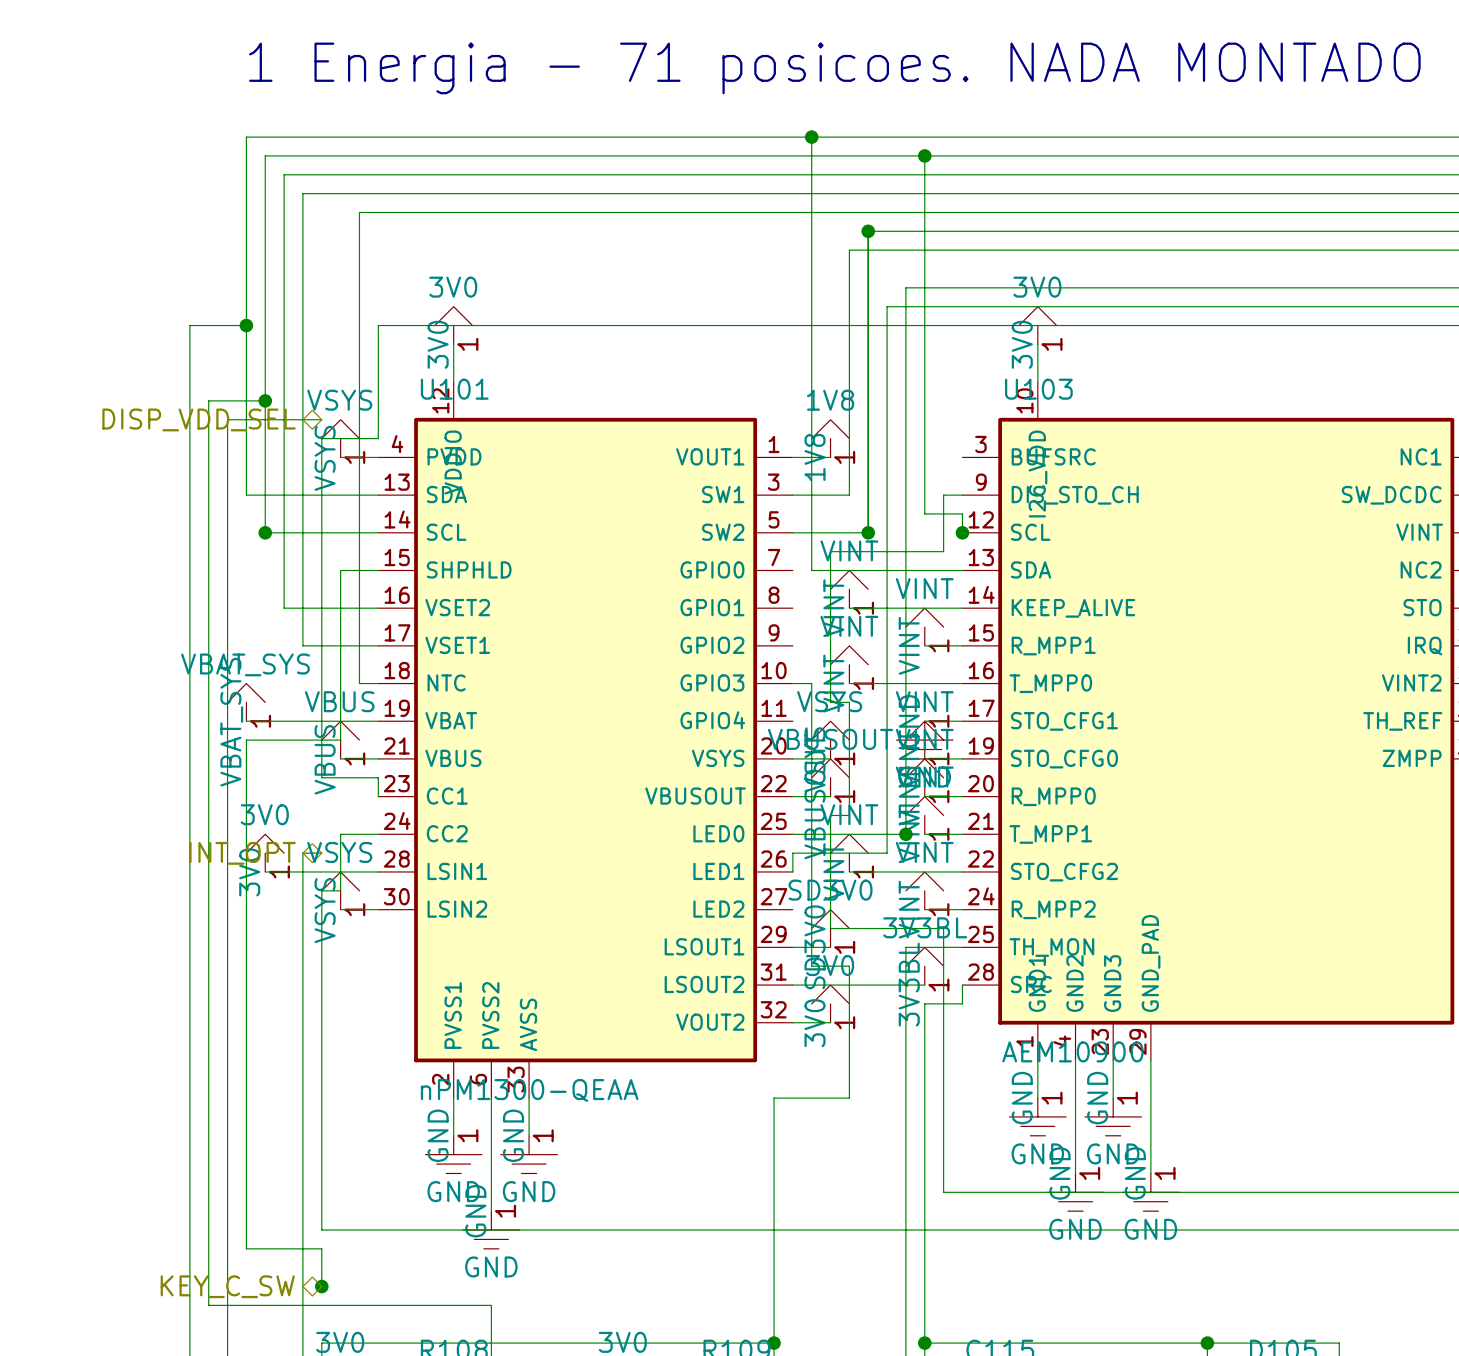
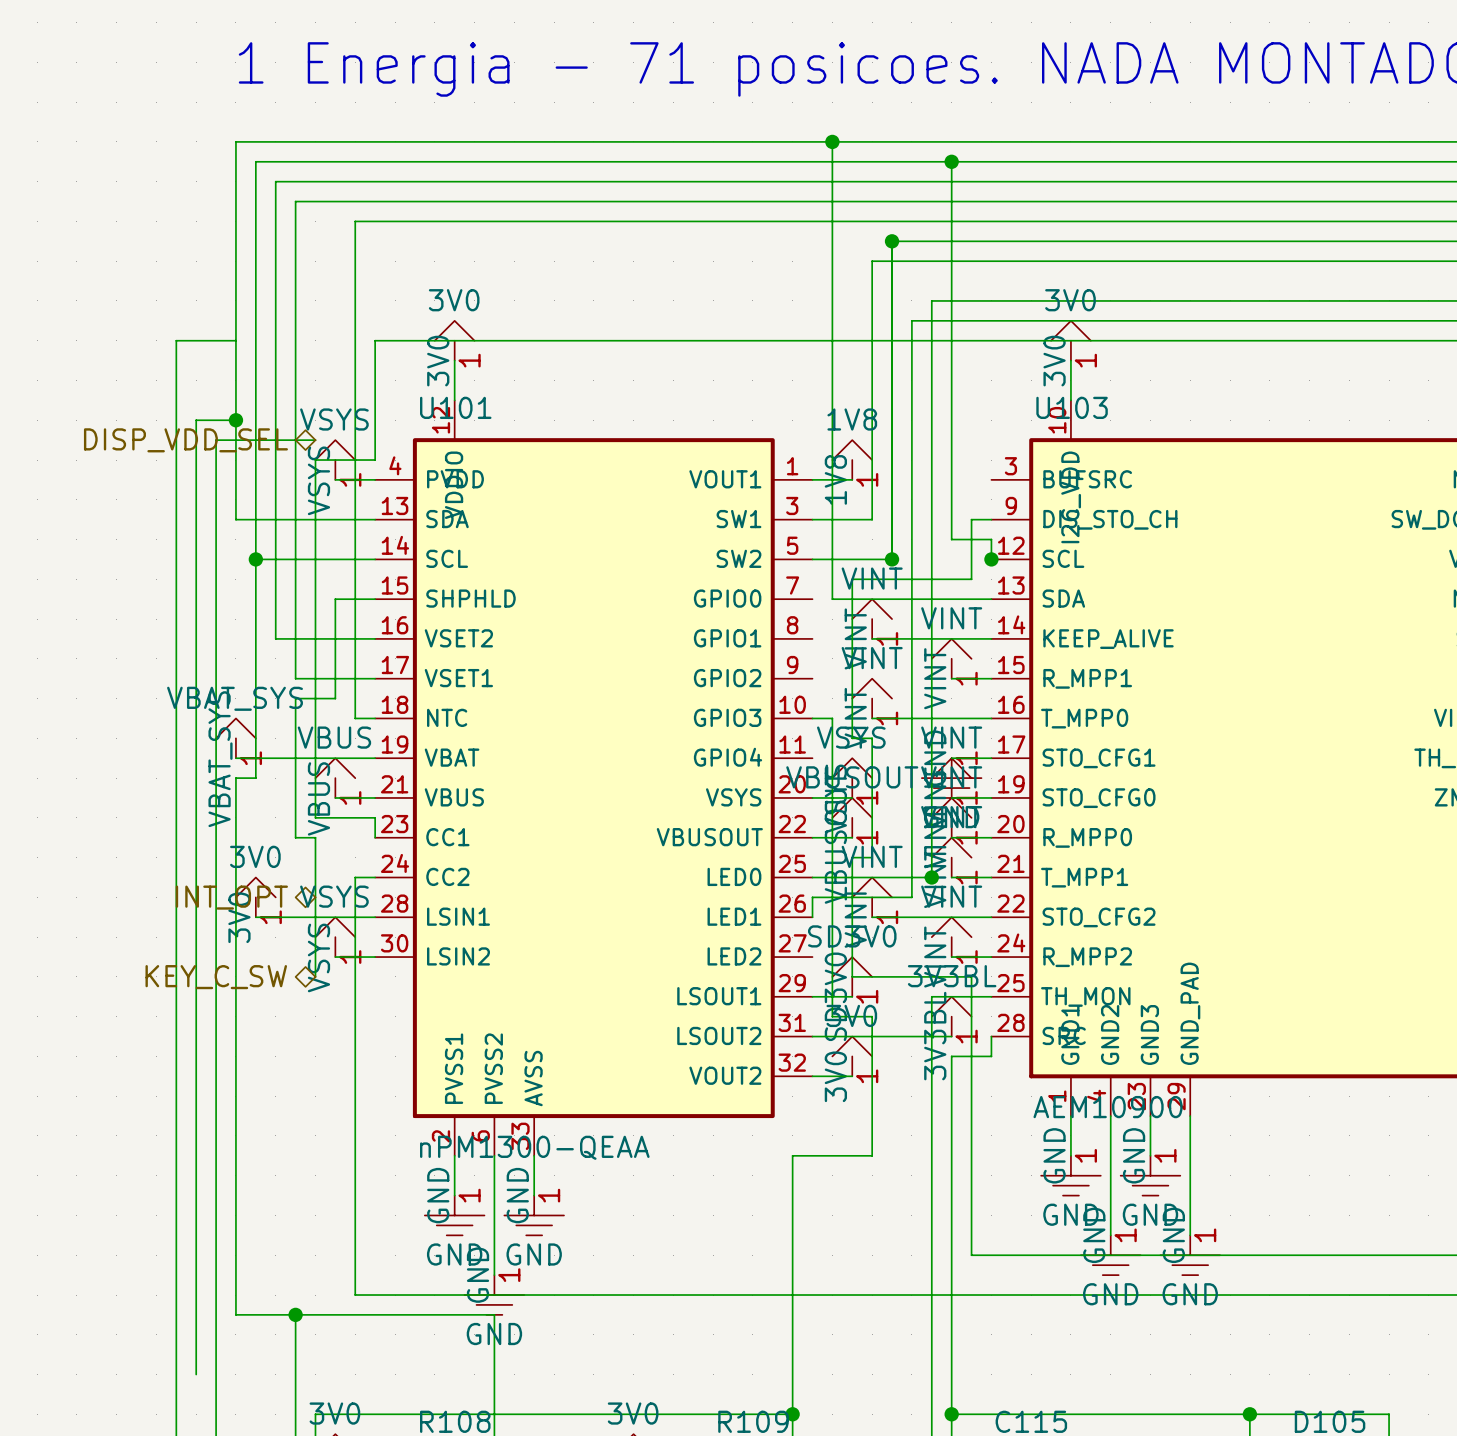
junction: (246, 325) -> none
wire: (246, 400) (265, 400) -> none
junction position: (265, 400) -> (235, 420)
wire: (340, 664) (340, 740) (265, 740) -> (255, 559) (255, 778)
wire: (359, 834) (340, 834) (340, 890) (321, 890) -> (335, 698) (295, 698) (295, 837) (315, 837) (315, 937)
wire: (321, 853) (302, 853) (302, 1248) -> none
wire: (321, 928) (321, 1230) (359, 1230) -> (355, 877) (355, 1295)
wire: (321, 1248) (321, 1286) -> none
hierarchical label position: KEY_C_SW (227, 1286) -> KEY_C_SW (216, 977)
junction position: (321, 1286) -> (295, 1314)
wire: (208, 1305) (491, 1305) -> (315, 1314) (494, 1314) (494, 1374)

